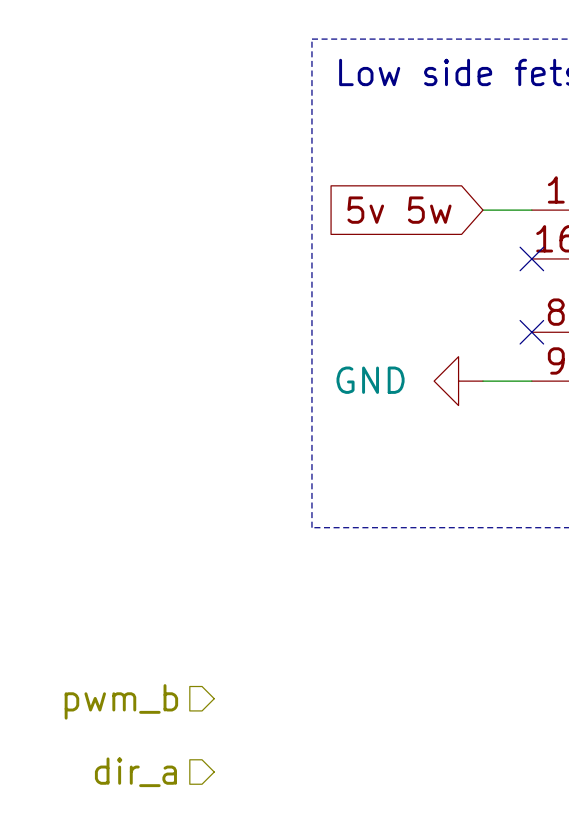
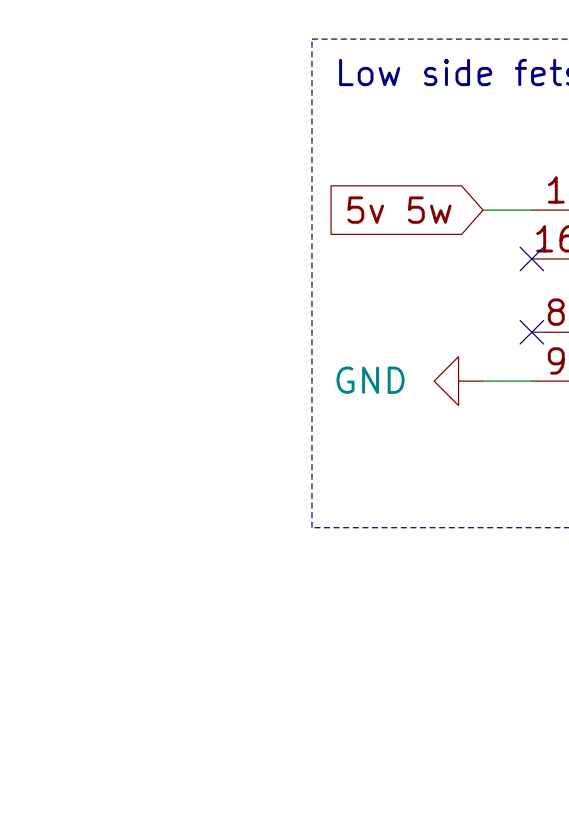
hierarchical label: pwm_b (121, 701) -> none
hierarchical label: dir_a (135, 772) -> none

